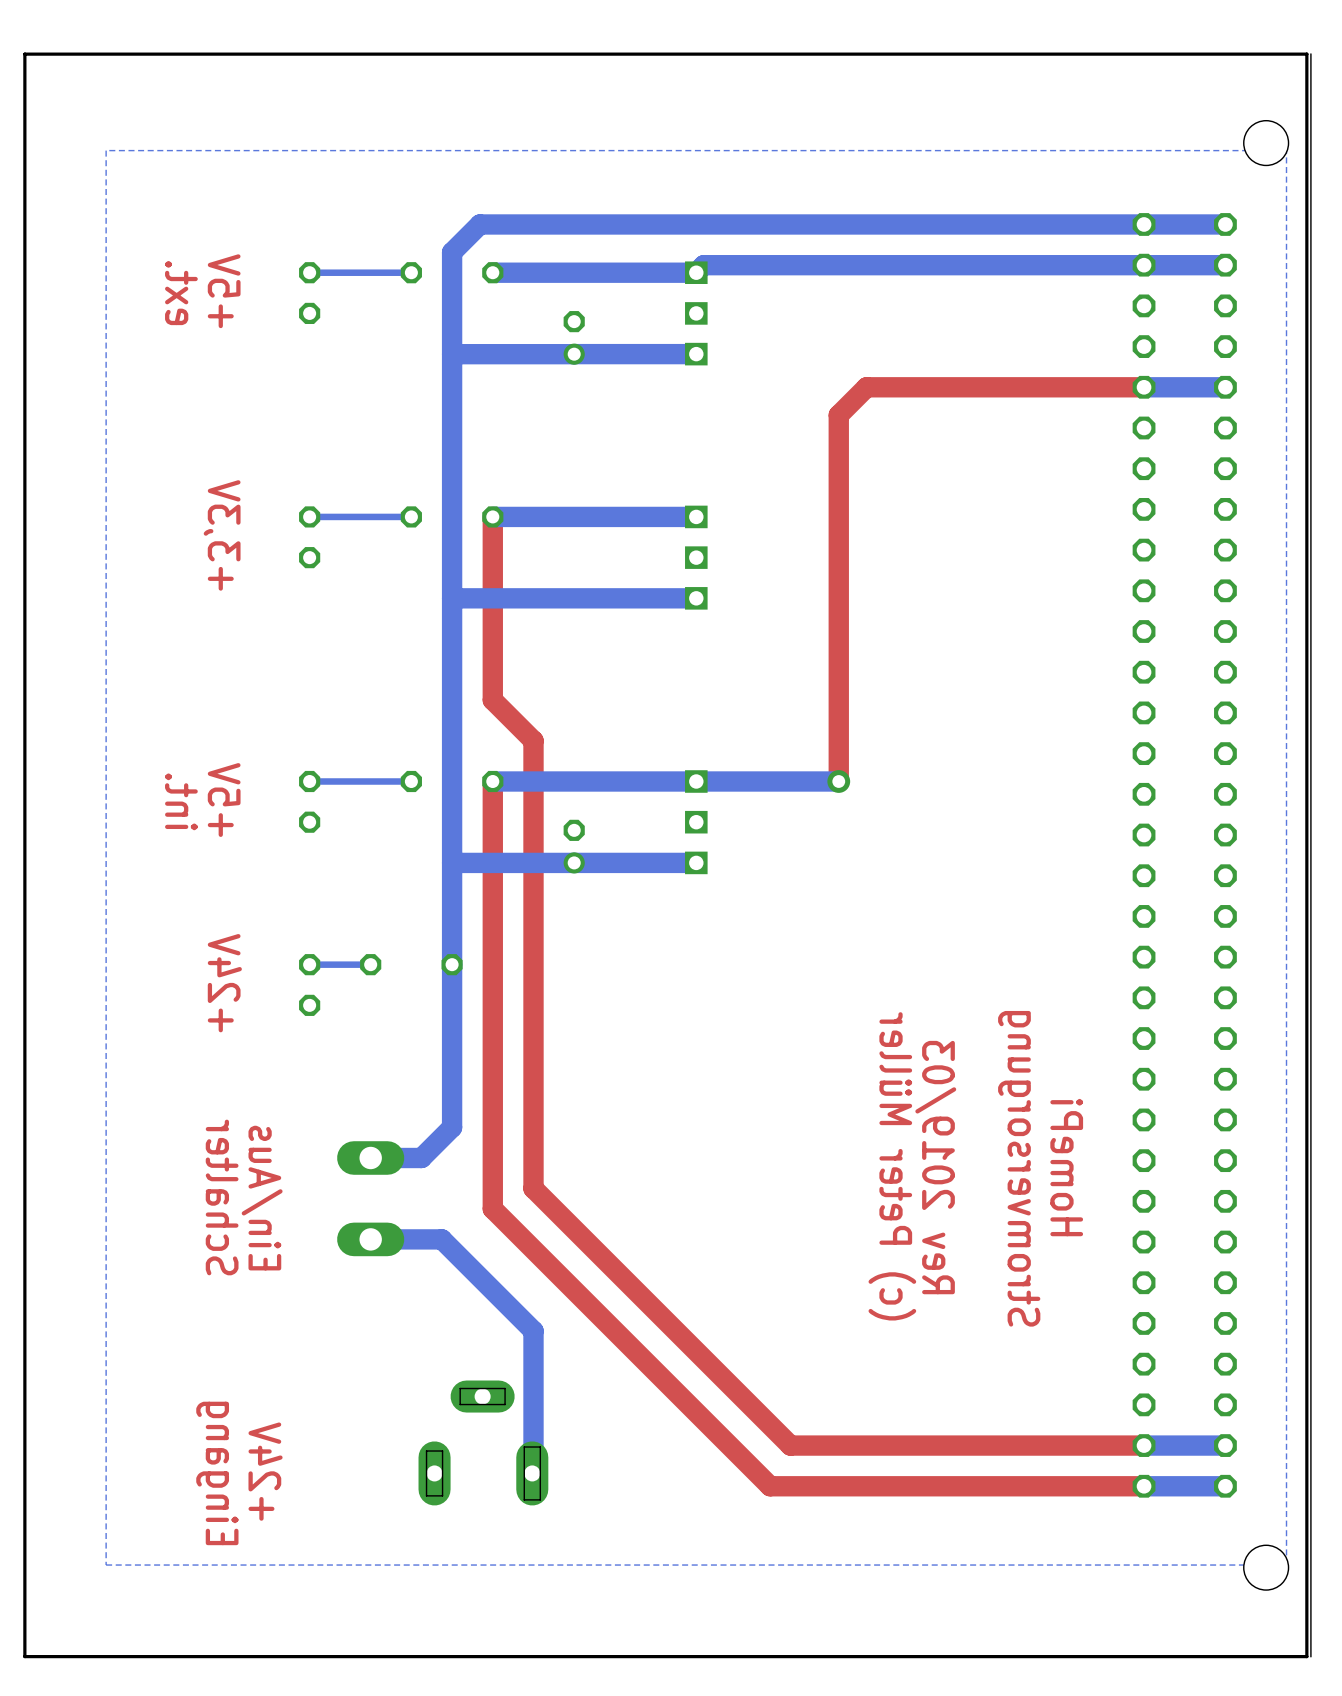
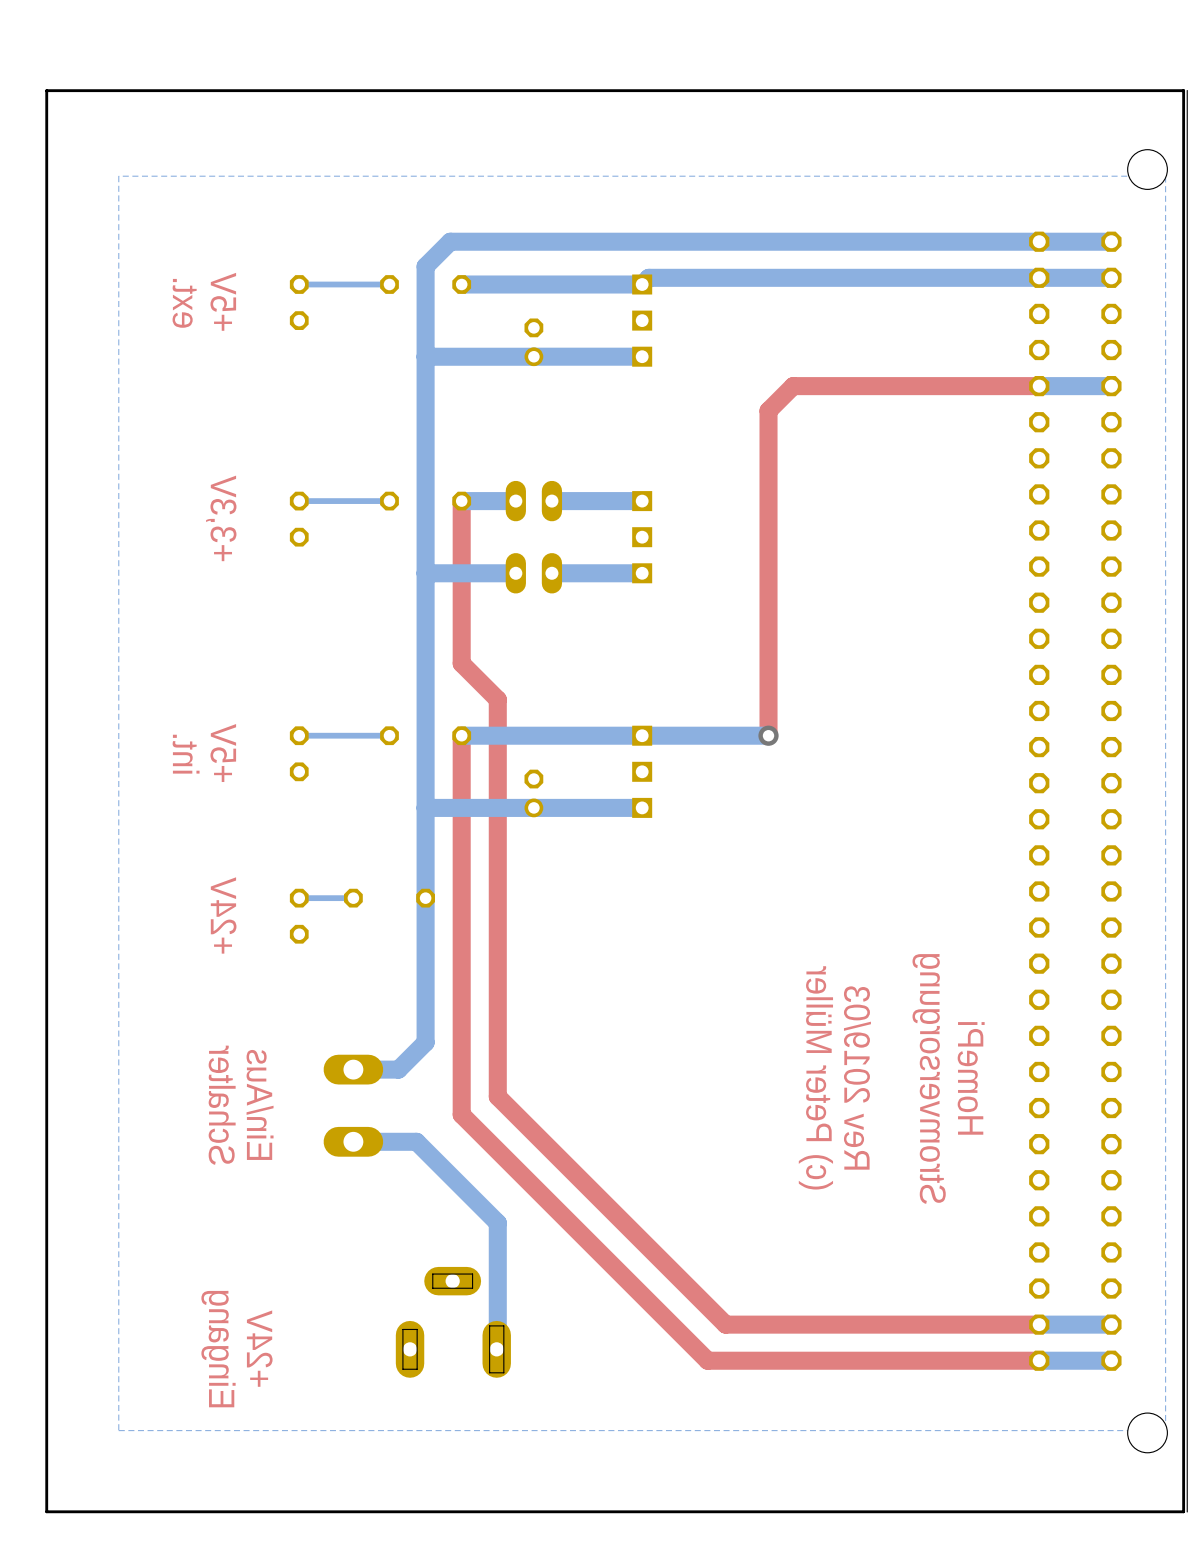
part: none -> (533, 501)
bottom track: (594, 516) (553, 516) -> none
part: none -> (533, 573)
bottom track: (594, 598) (553, 598) -> none

